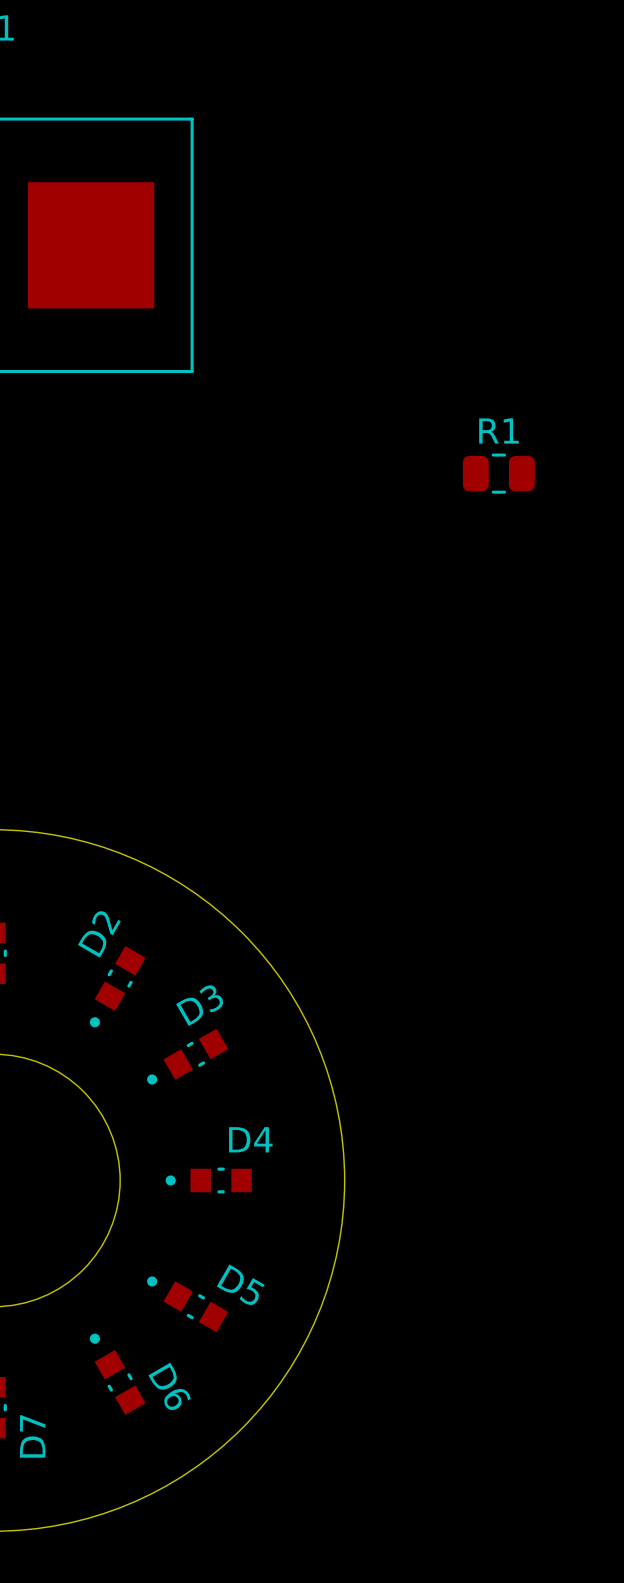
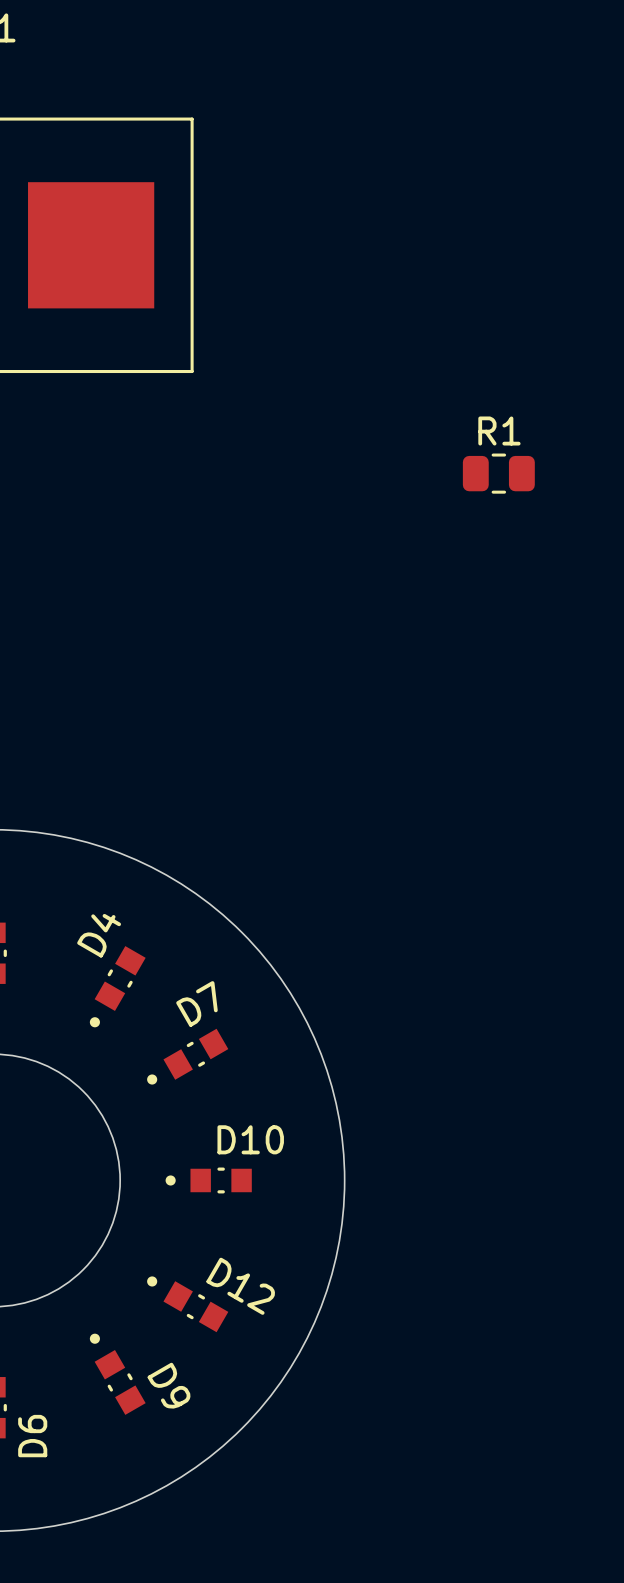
D2 name: D2 (99, 934) -> D4 (99, 935)
D3 name: D3 (200, 1005) -> D7 (196, 1003)
D4 name: D4 (250, 1139) -> D10 (250, 1139)
D5 name: D5 (240, 1285) -> D12 (240, 1286)
D6 name: D6 (169, 1386) -> D9 (169, 1385)
D7 name: D7 (32, 1436) -> D6 (32, 1436)

